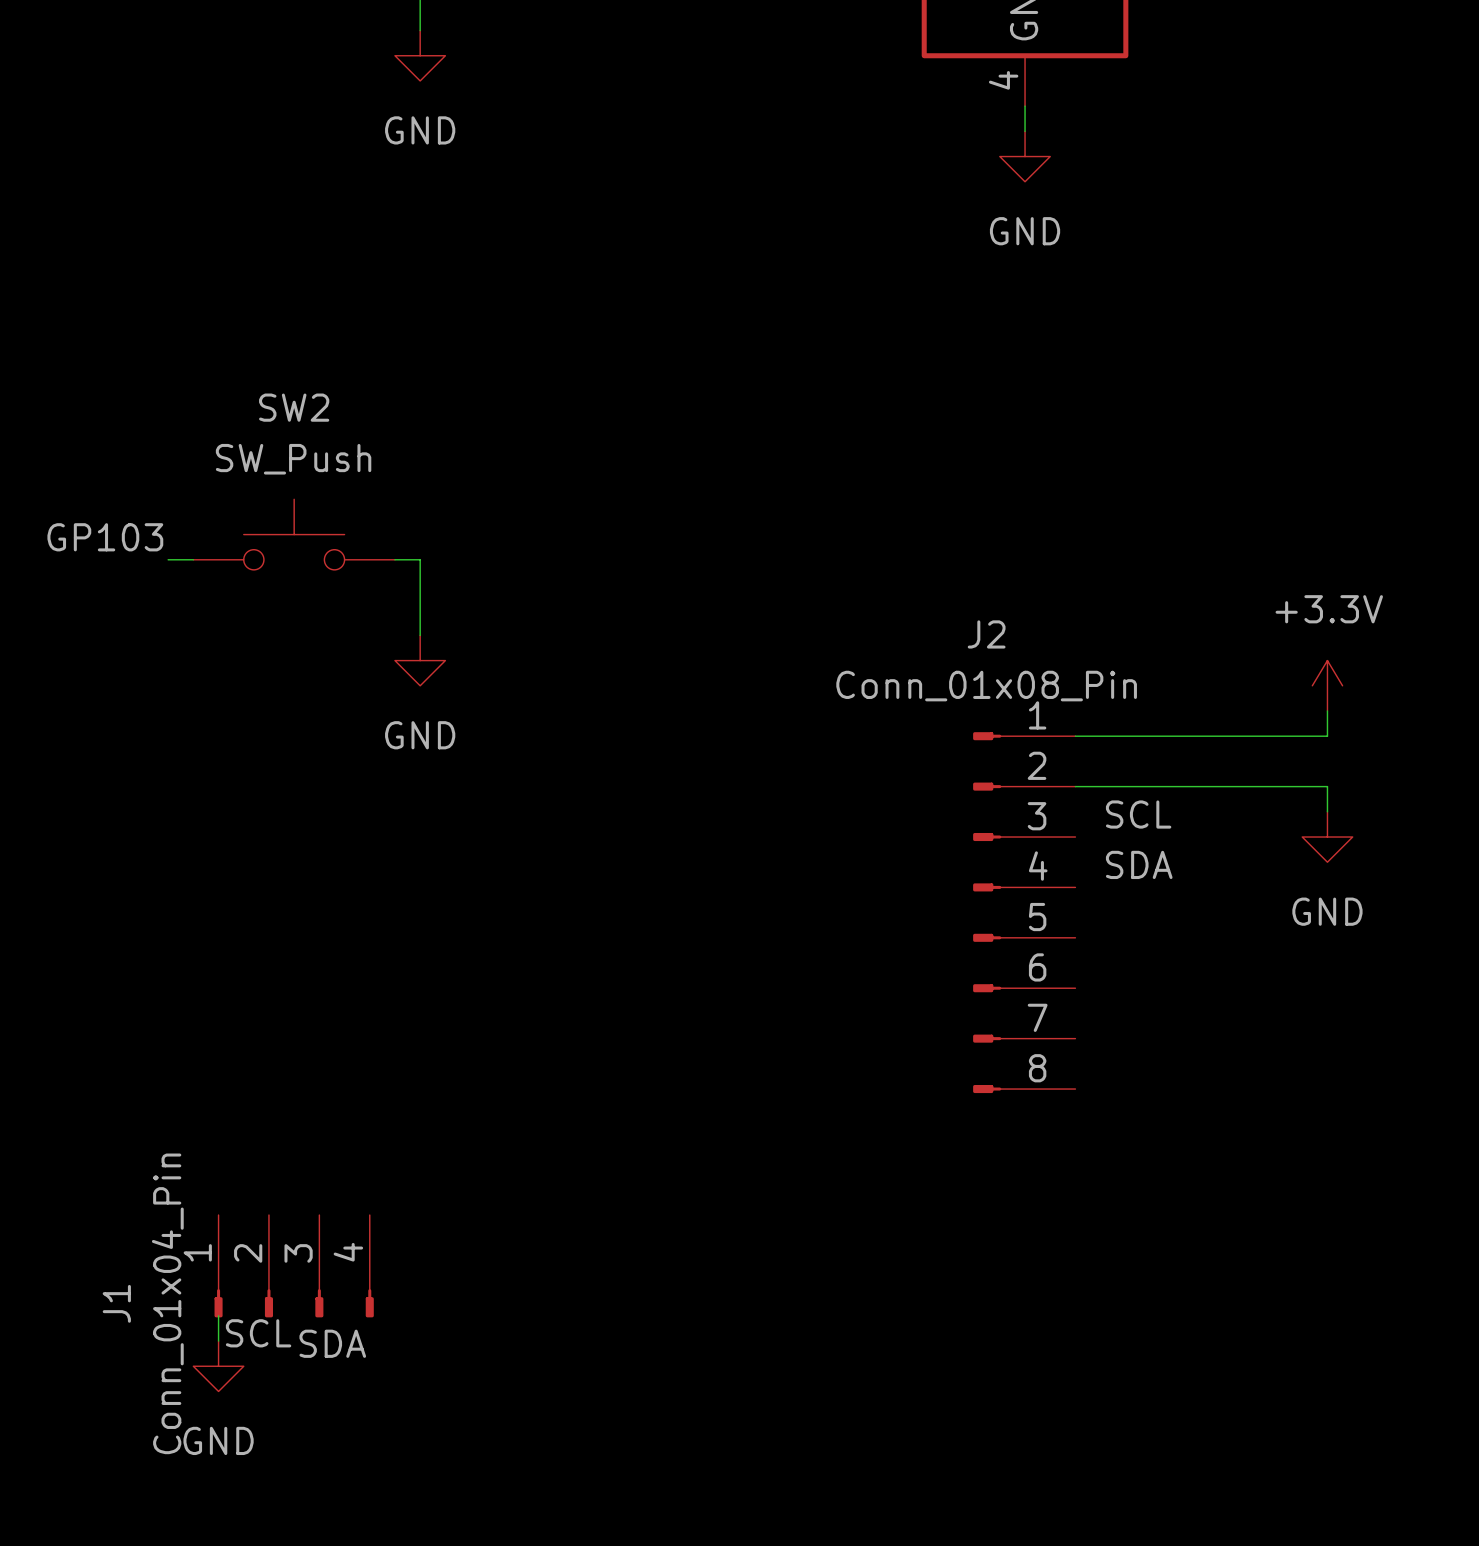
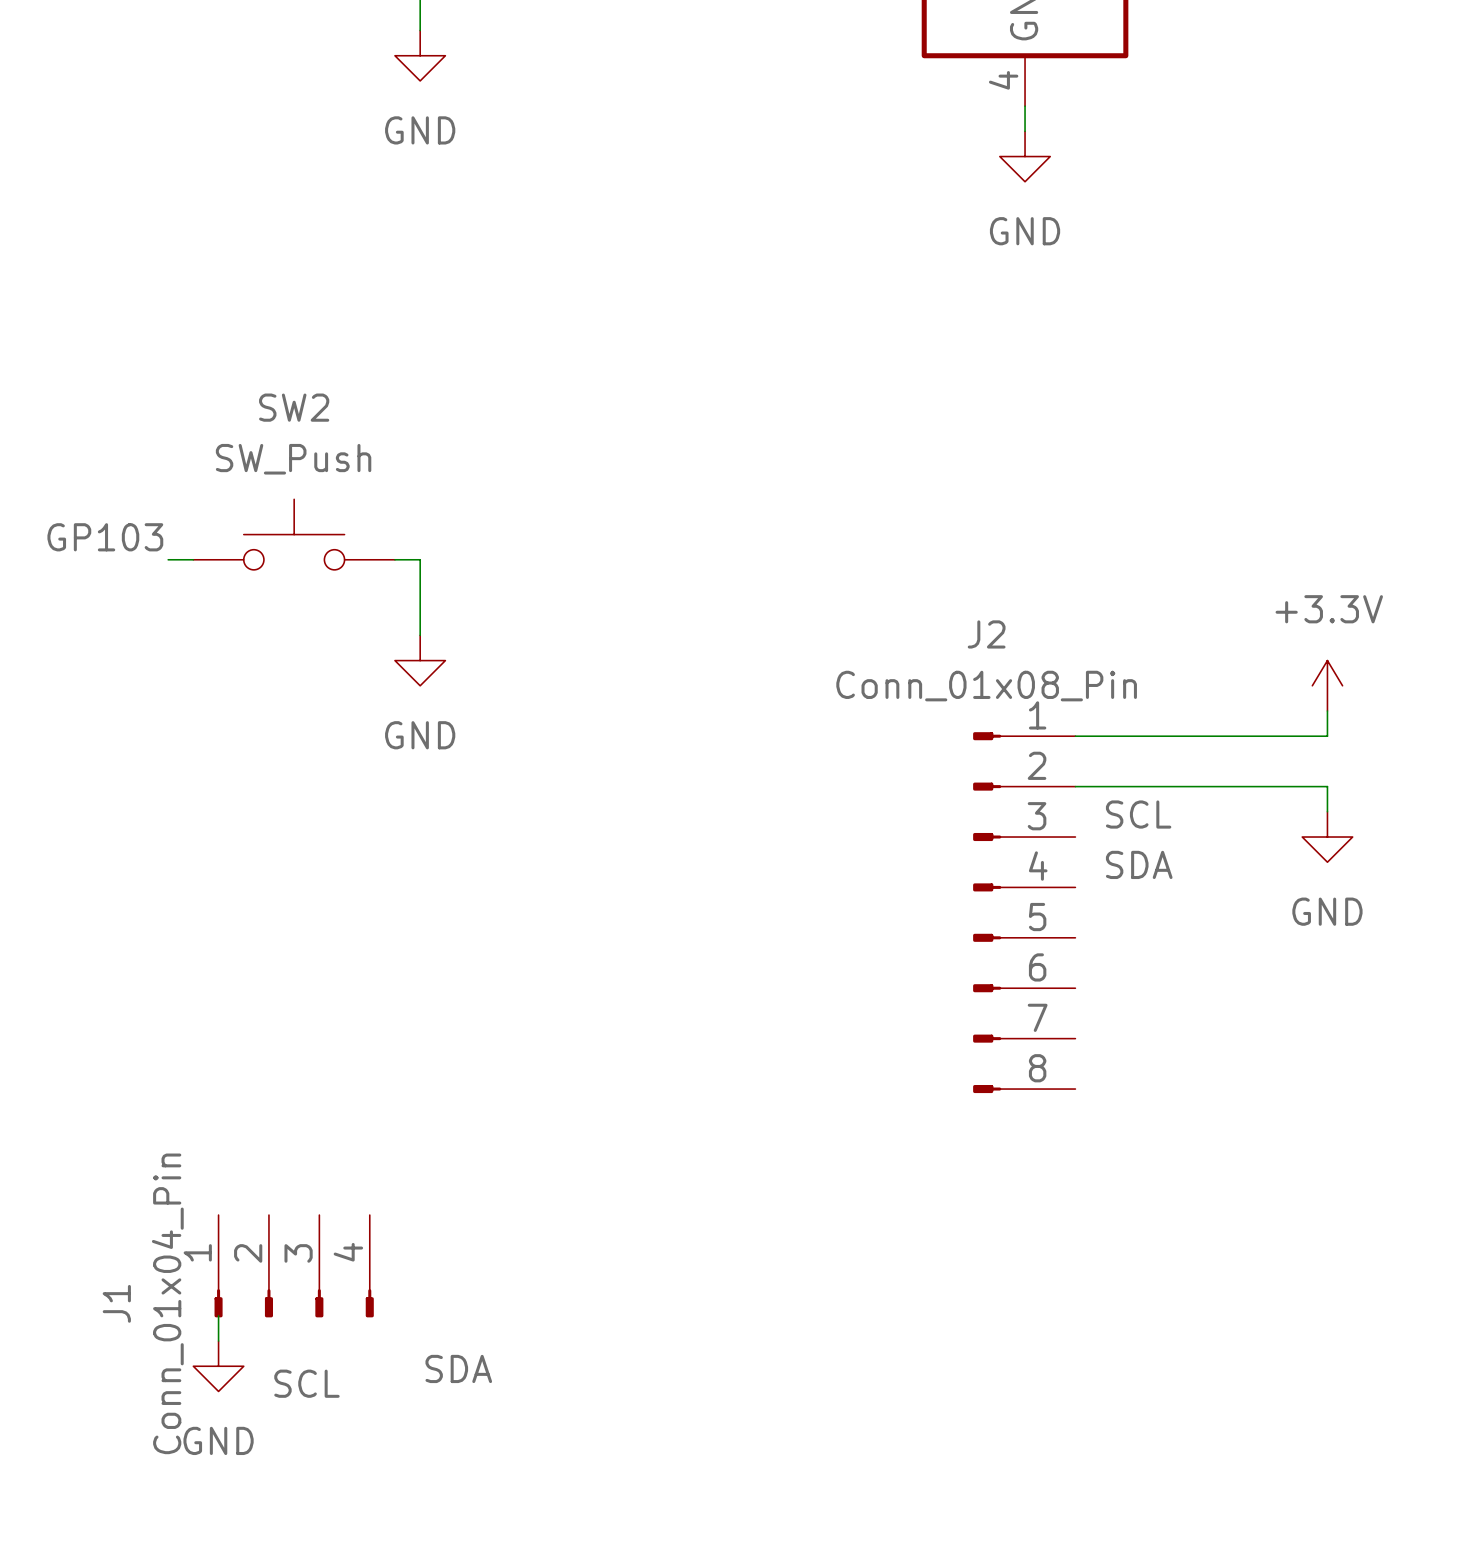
label position: SCL (258, 1333) -> SCL (306, 1383)
label position: SDA (332, 1343) -> SDA (458, 1368)

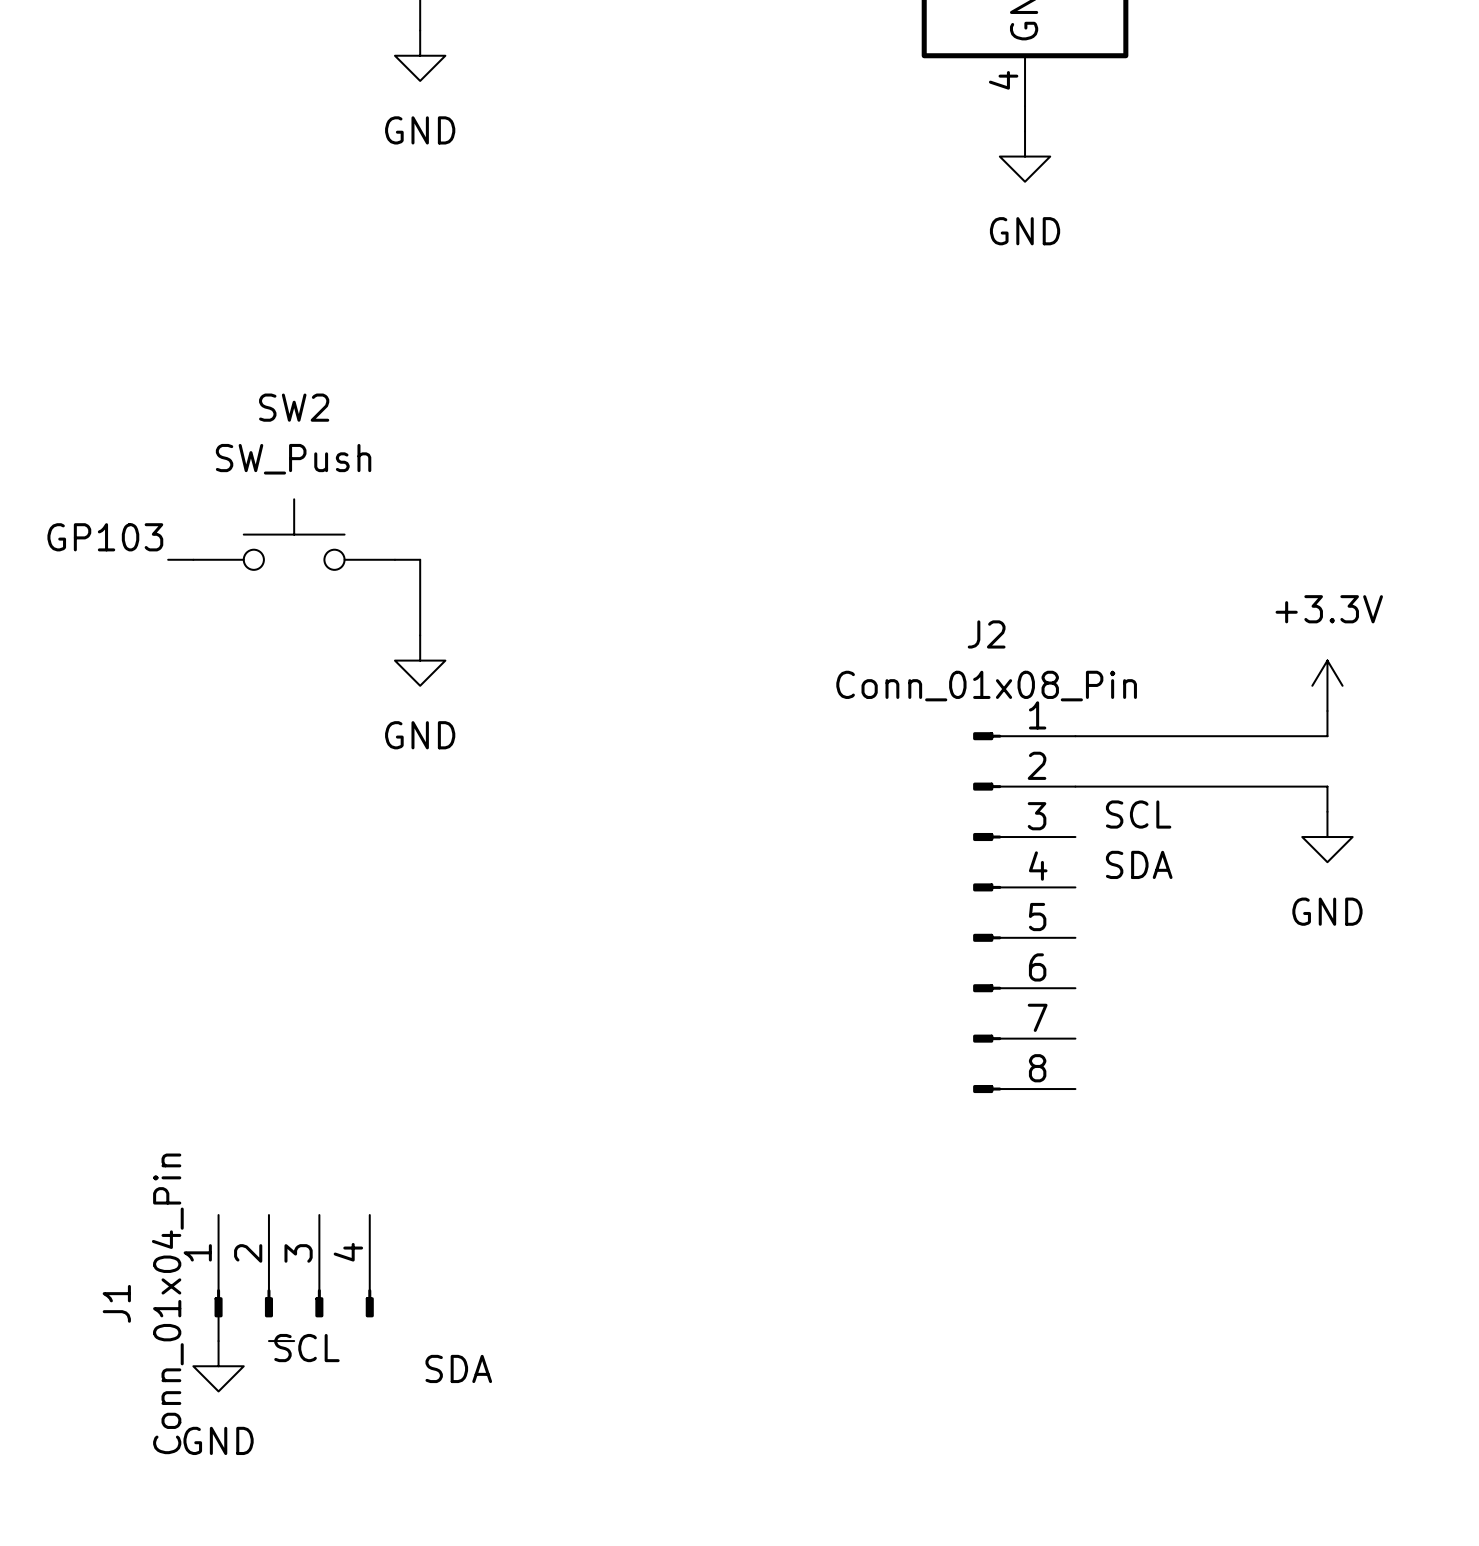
wire: none -> (268, 1341) (294, 1341)
label position: SCL (306, 1383) -> SCL (306, 1348)

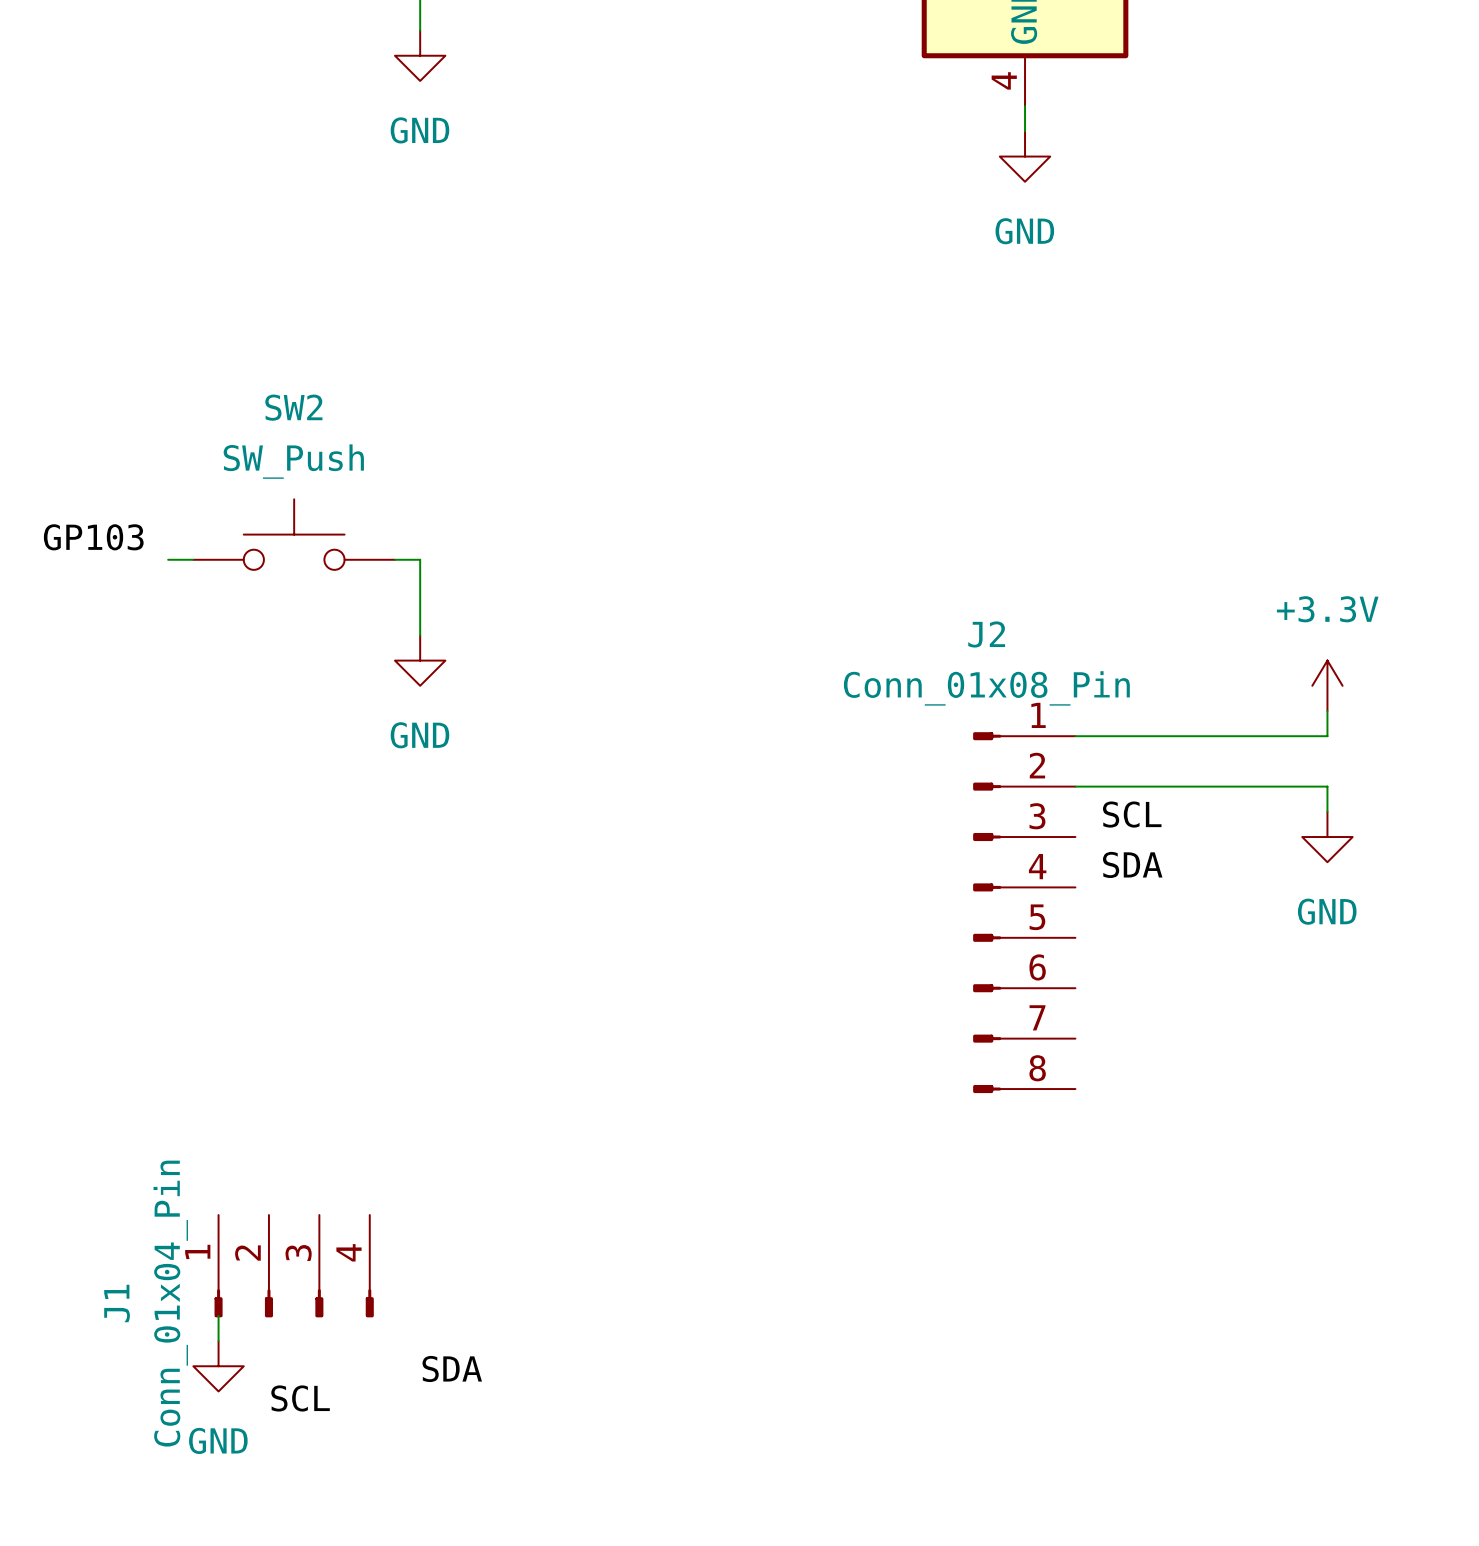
wire: (268, 1341) (294, 1341) -> none
label position: SCL (306, 1348) -> SCL (300, 1398)

